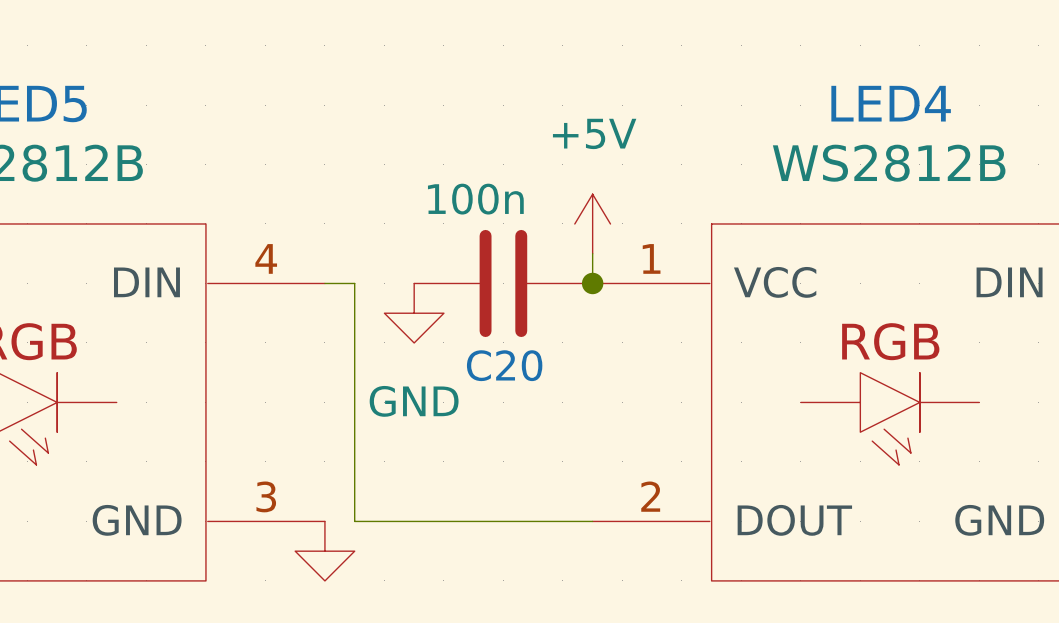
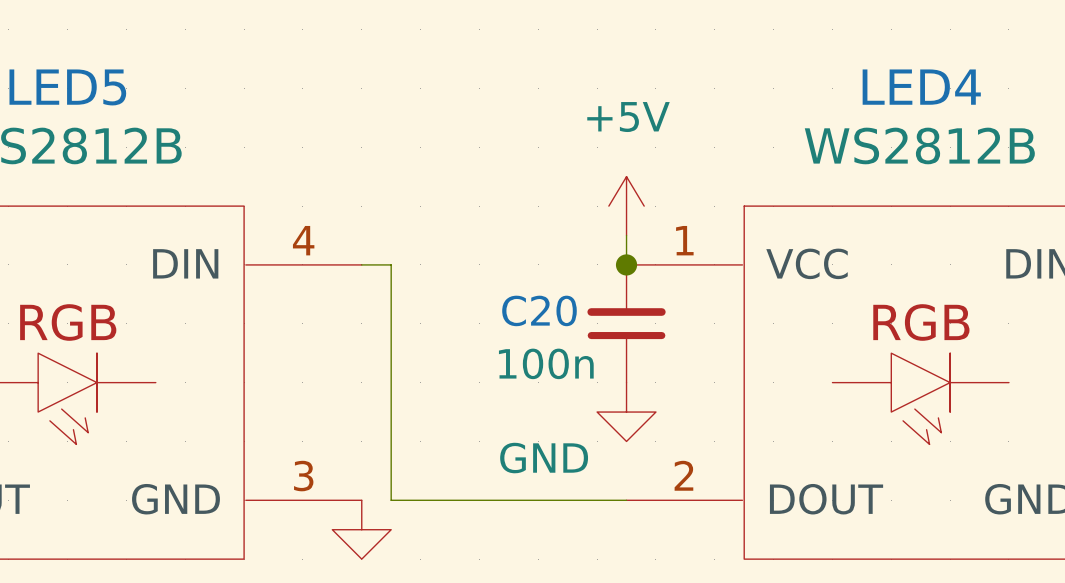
C20 value position: 100n (475, 199) -> 100n (546, 363)
C20 symbol: [414, 229, 593, 338] -> [587, 264, 666, 383]
power symbol position: GND (414, 313) -> GND (626, 412)
C20 name position: C20 (504, 365) -> C20 (539, 310)
power symbol text position: GND (414, 401) -> GND (544, 458)

